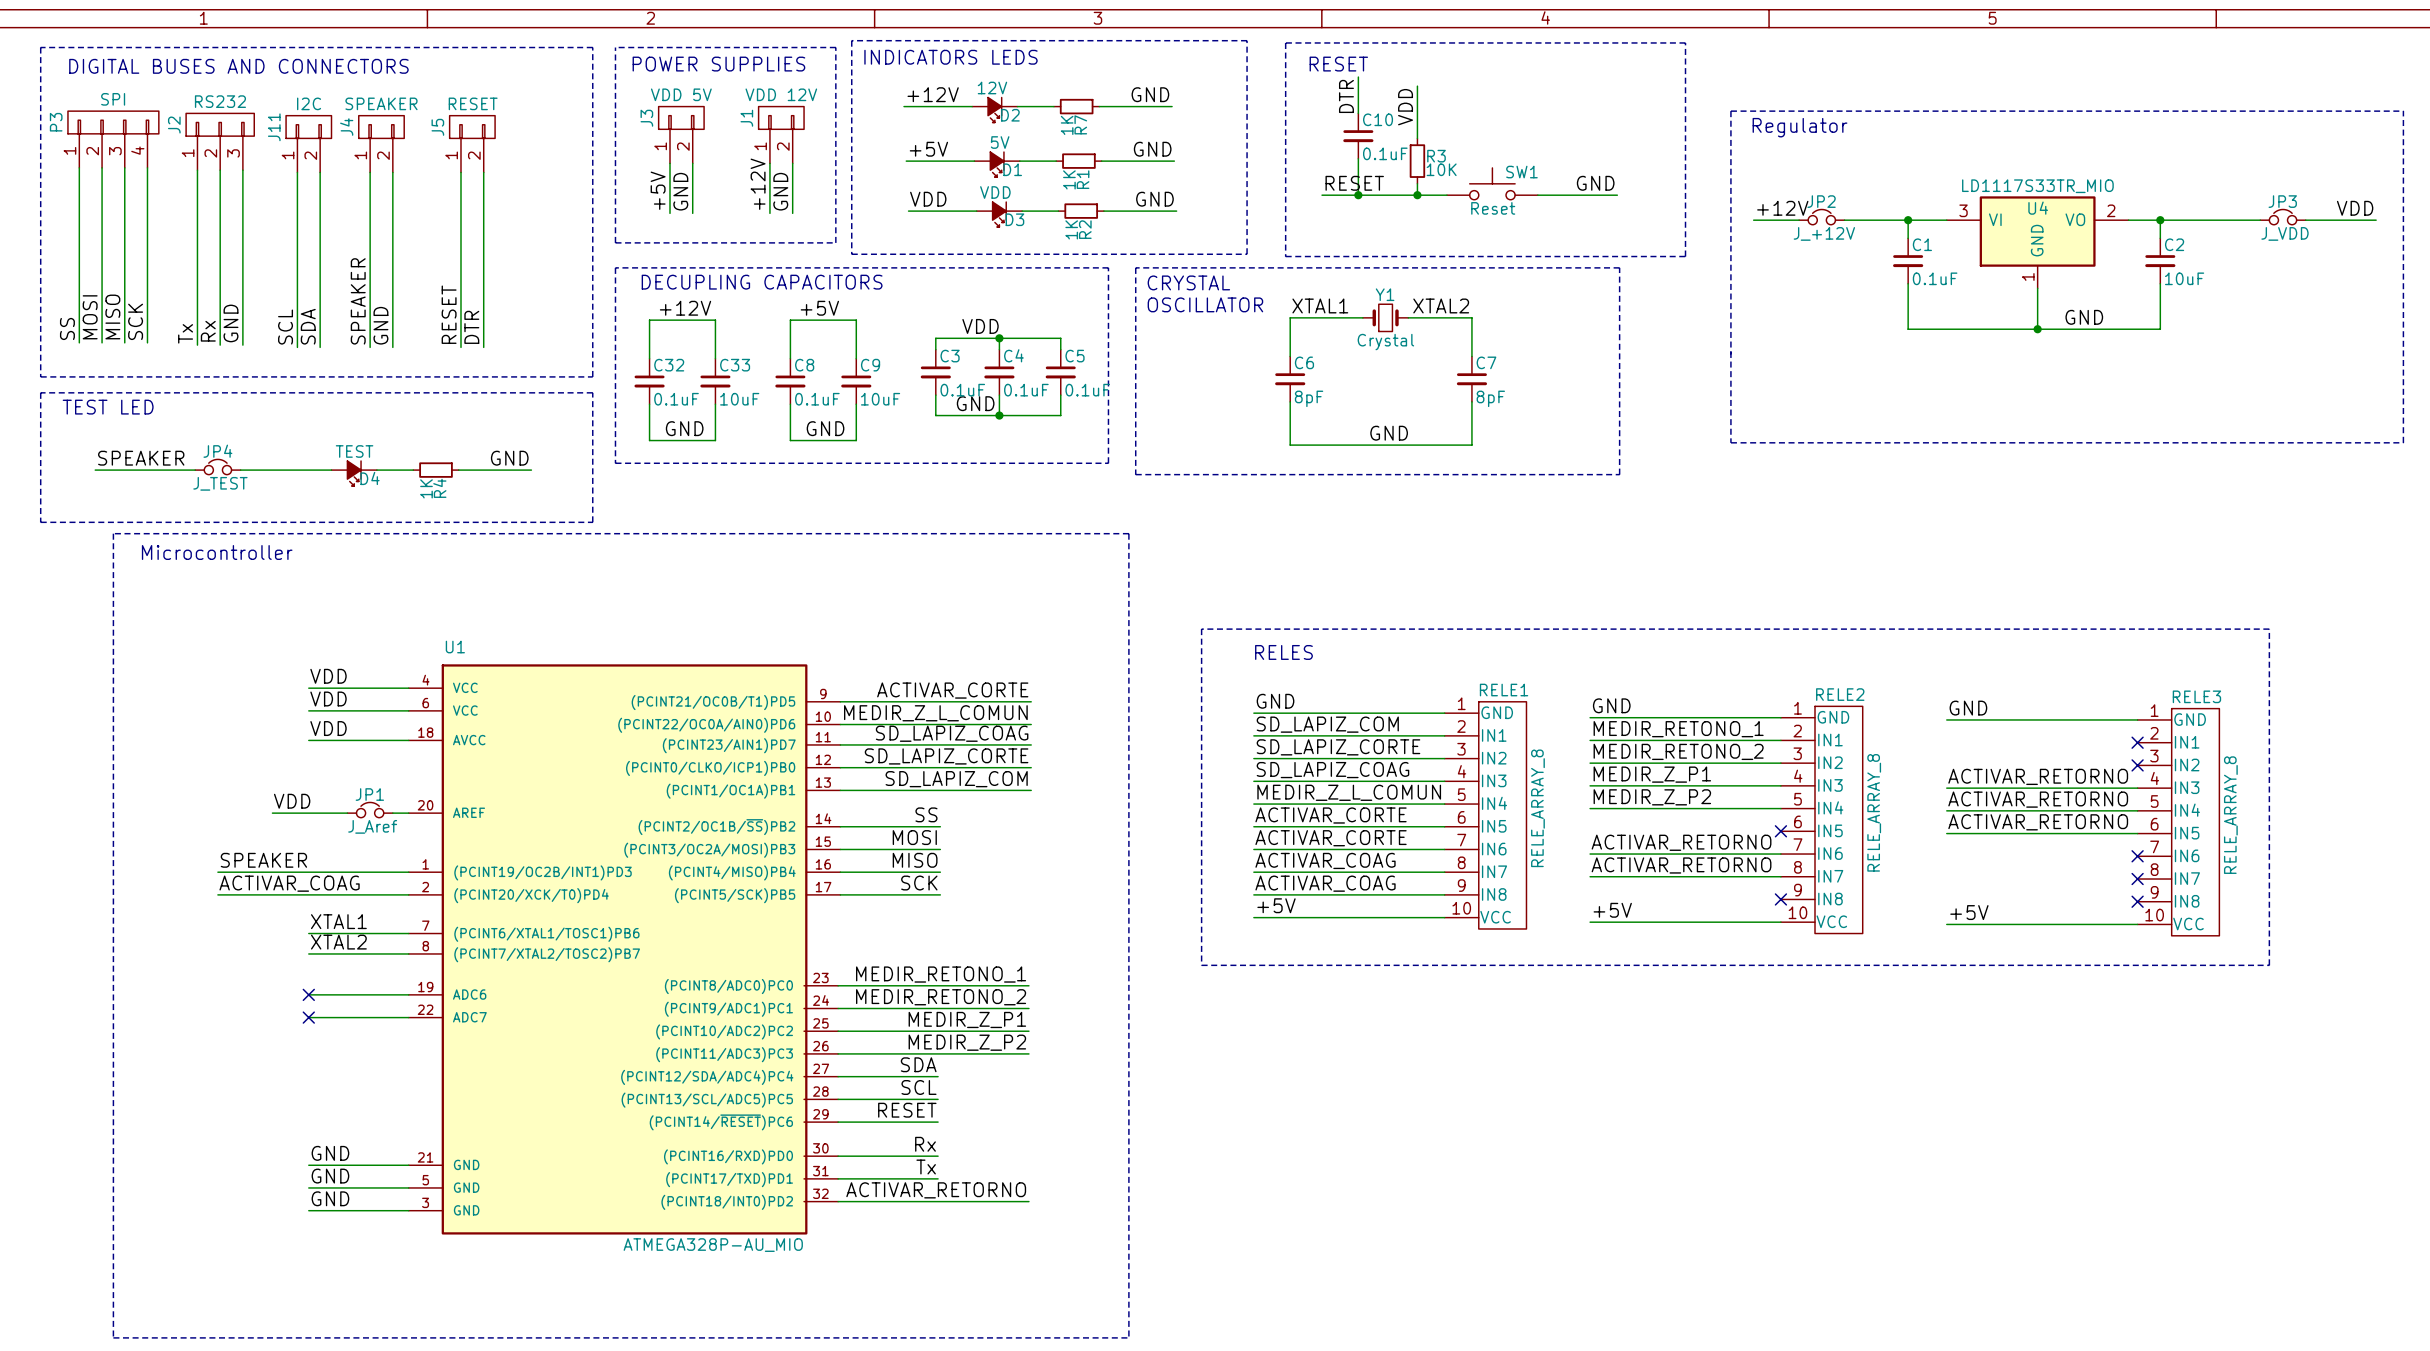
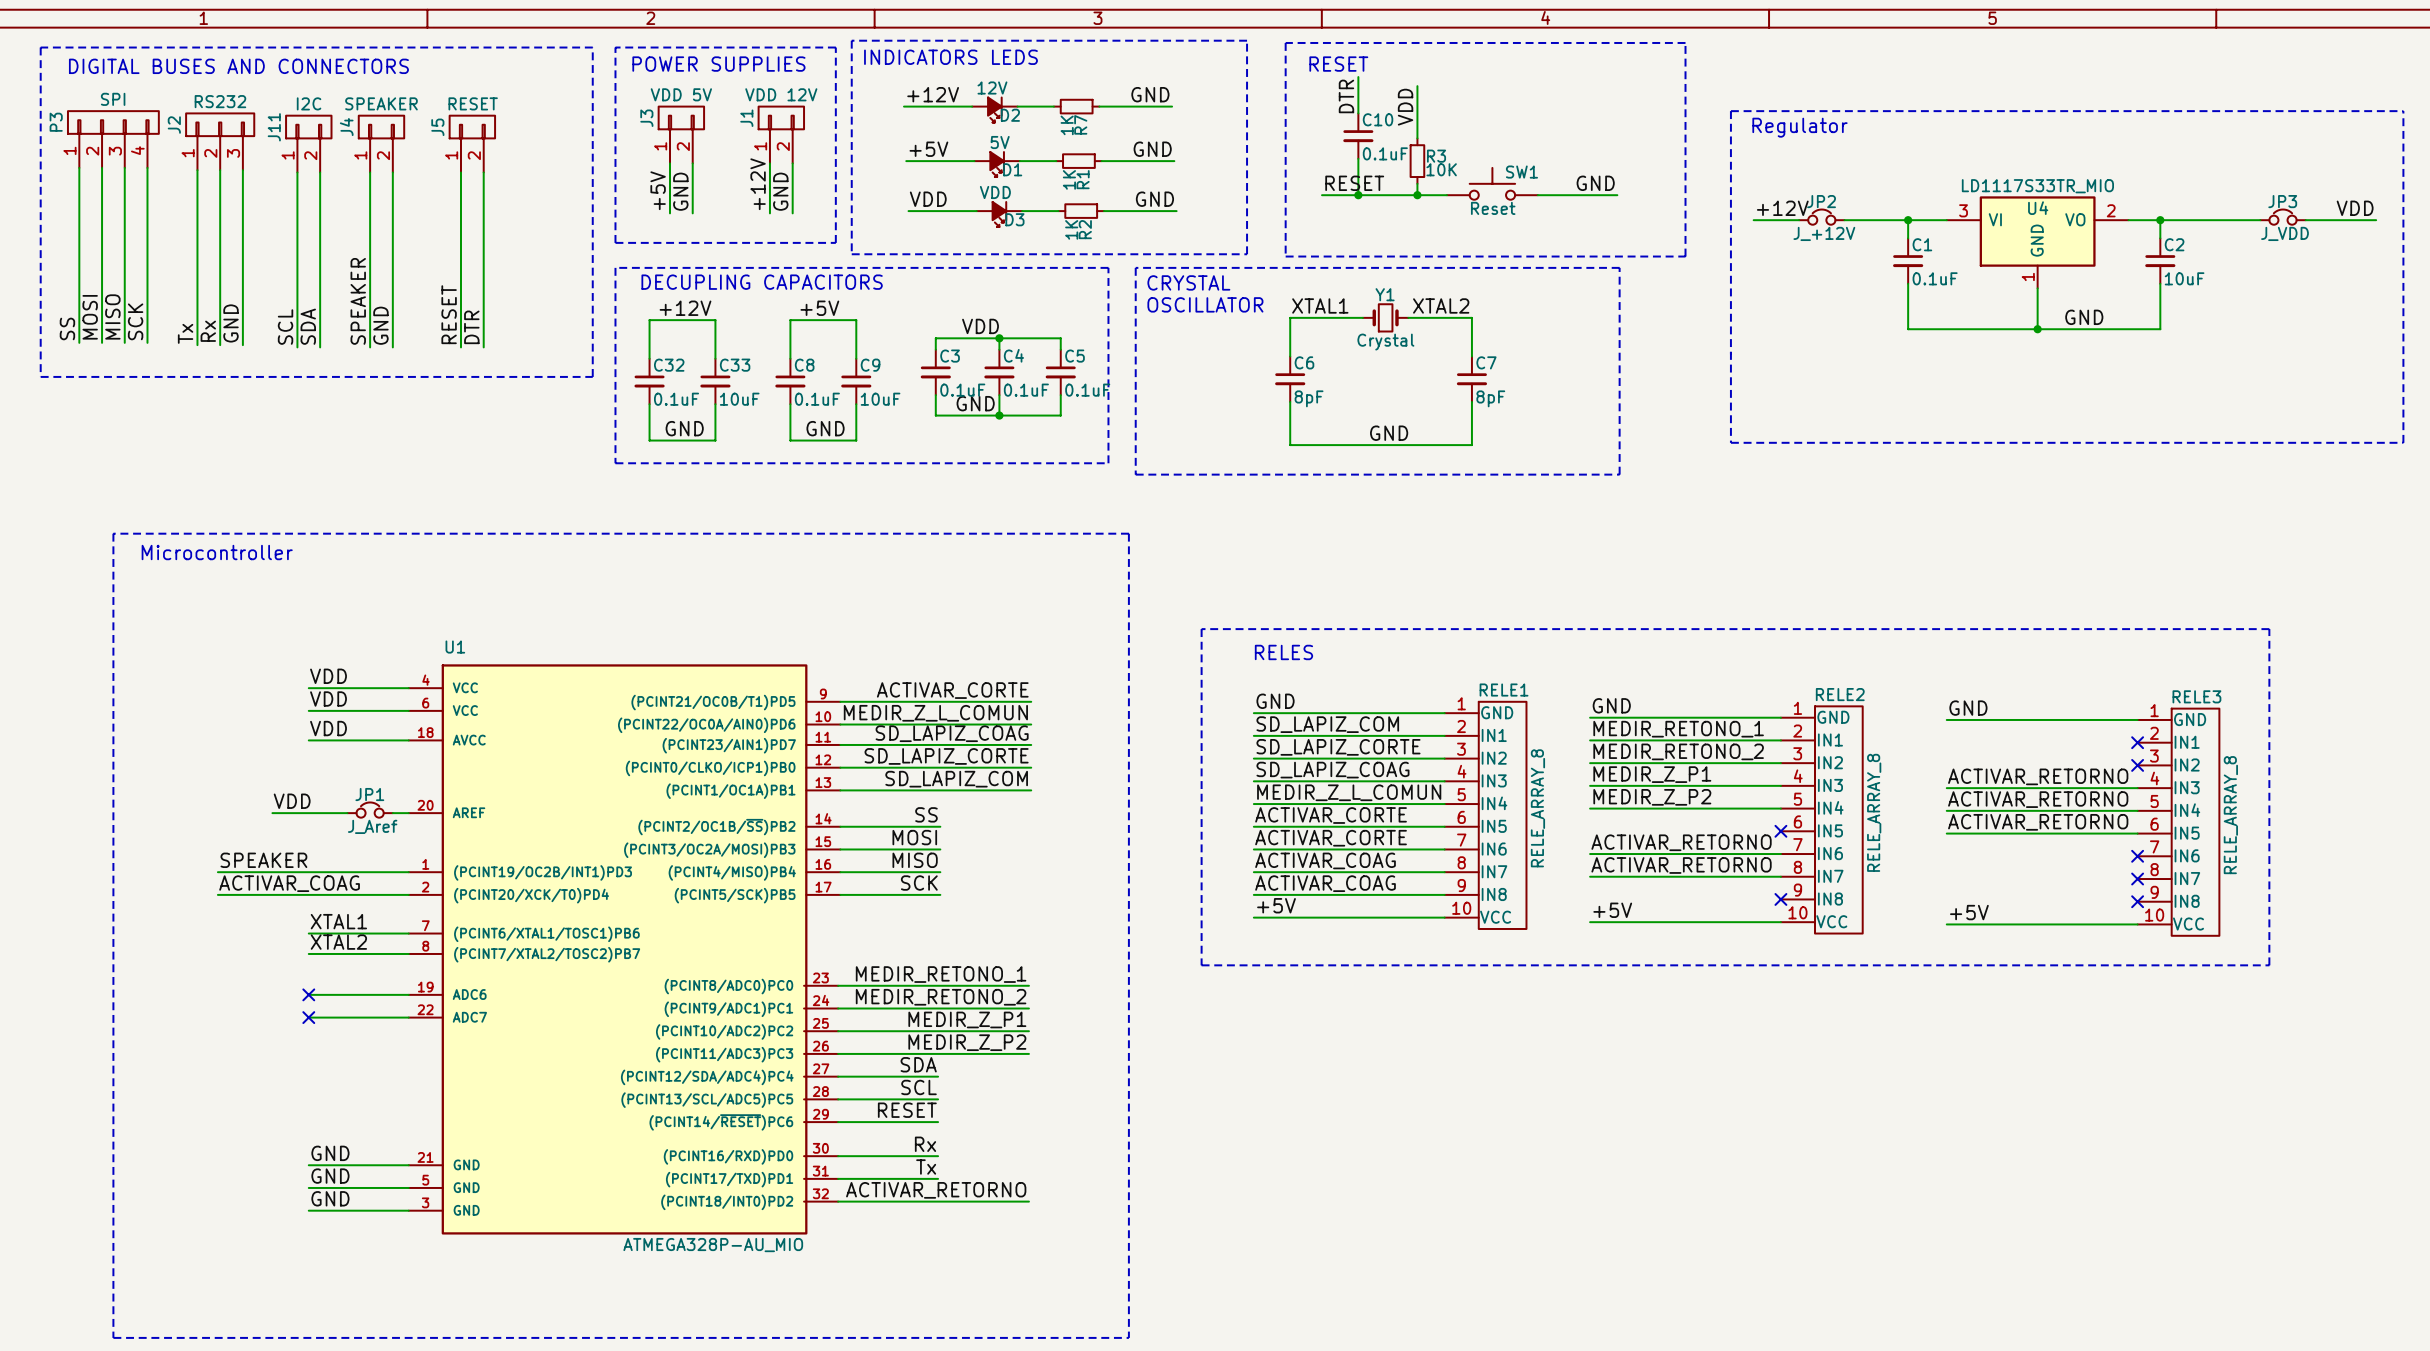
line: (40, 392) (40, 522) (592, 522) (592, 392) (40, 392) -> none
text: TEST LED (108, 407) -> none
label: SPEAKER (141, 458) -> none
label: GND (509, 458) -> none
JP4: J_TEST (217, 467) -> none
wire: (95, 470) (195, 470) -> none
wire: (240, 470) (331, 470) -> none
wire: (376, 470) (413, 470) -> none
R4: 1K (436, 470) -> none
wire: (458, 470) (531, 470) -> none
D4: TEST (354, 473) -> none

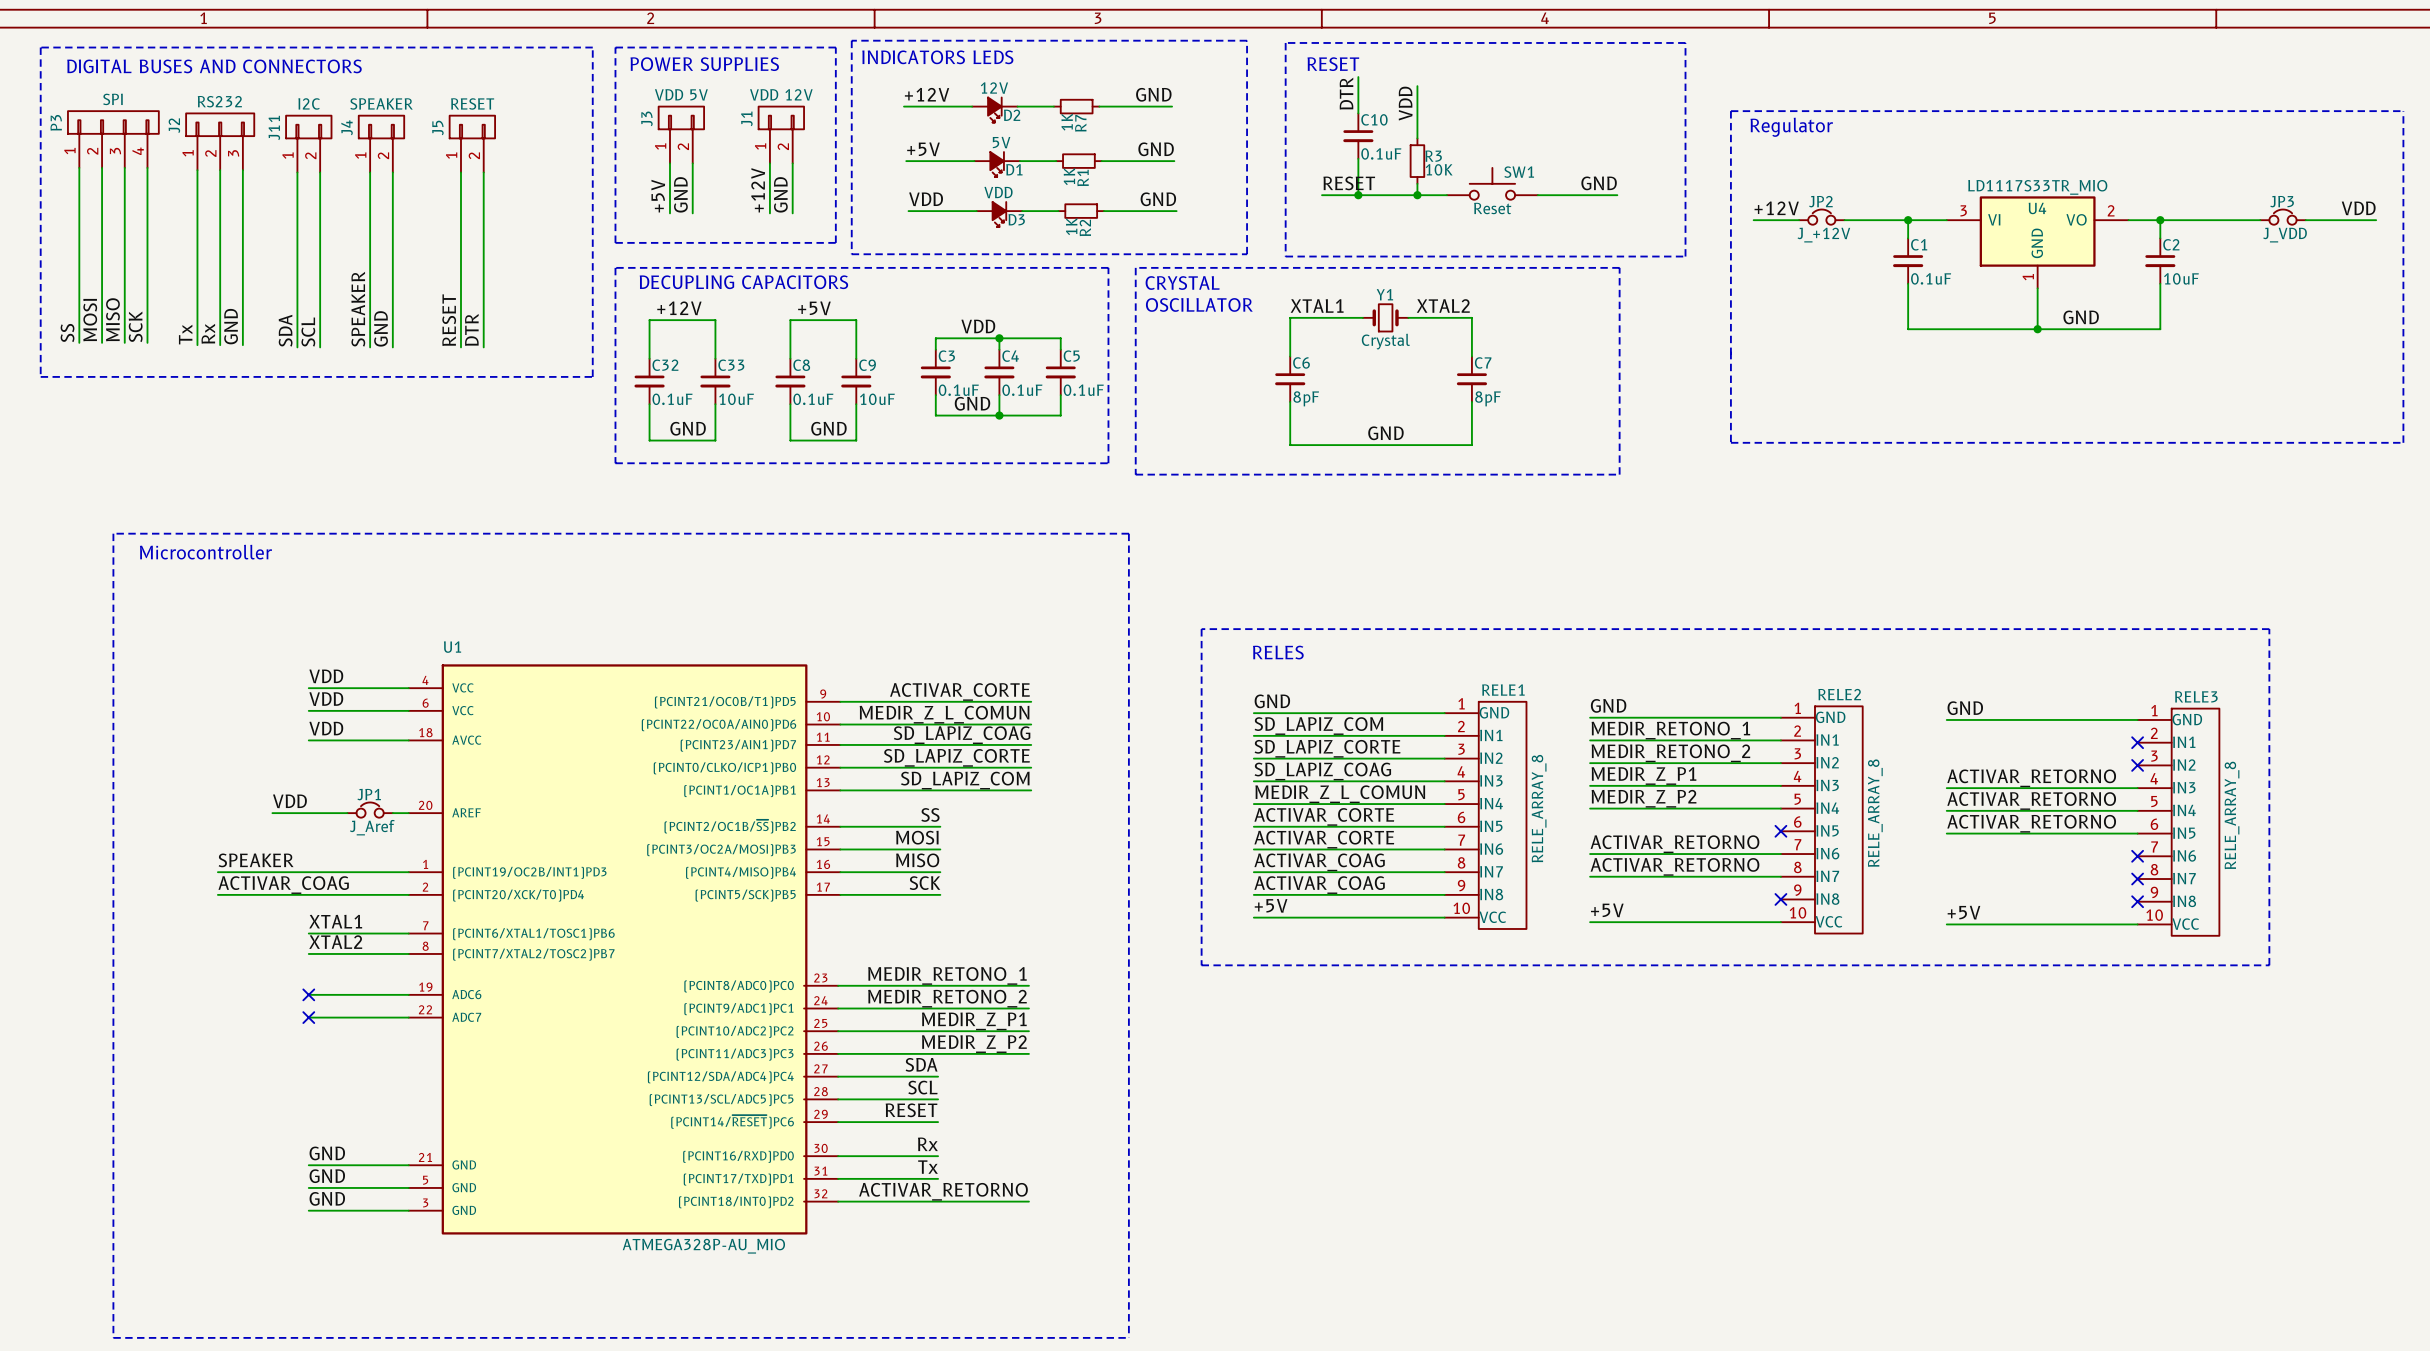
label: SDA (308, 326) -> SCL (308, 332)
label: SCL (285, 327) -> SDA (285, 330)

